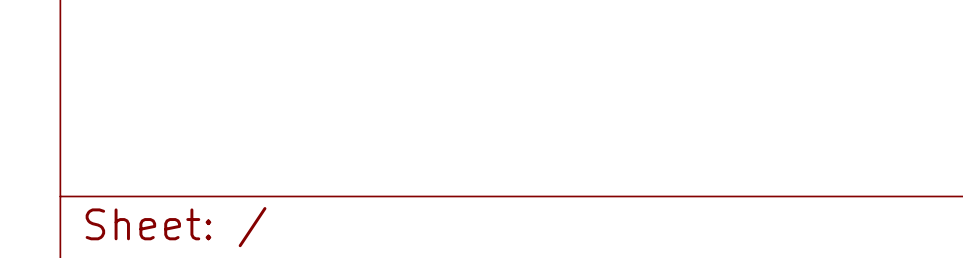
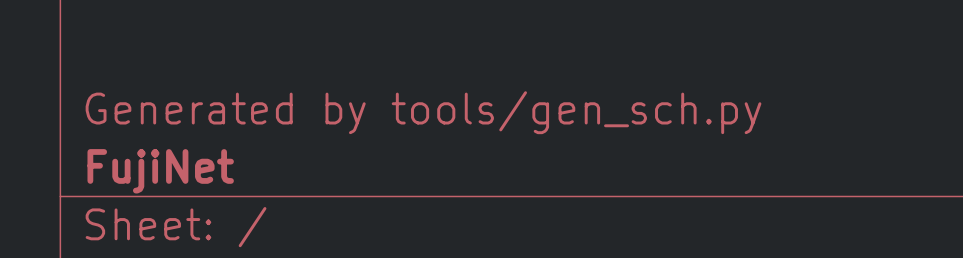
title block: none -> Generated by tools/gen_sch.py (423, 112)
title block: none -> FujiNet (160, 171)

